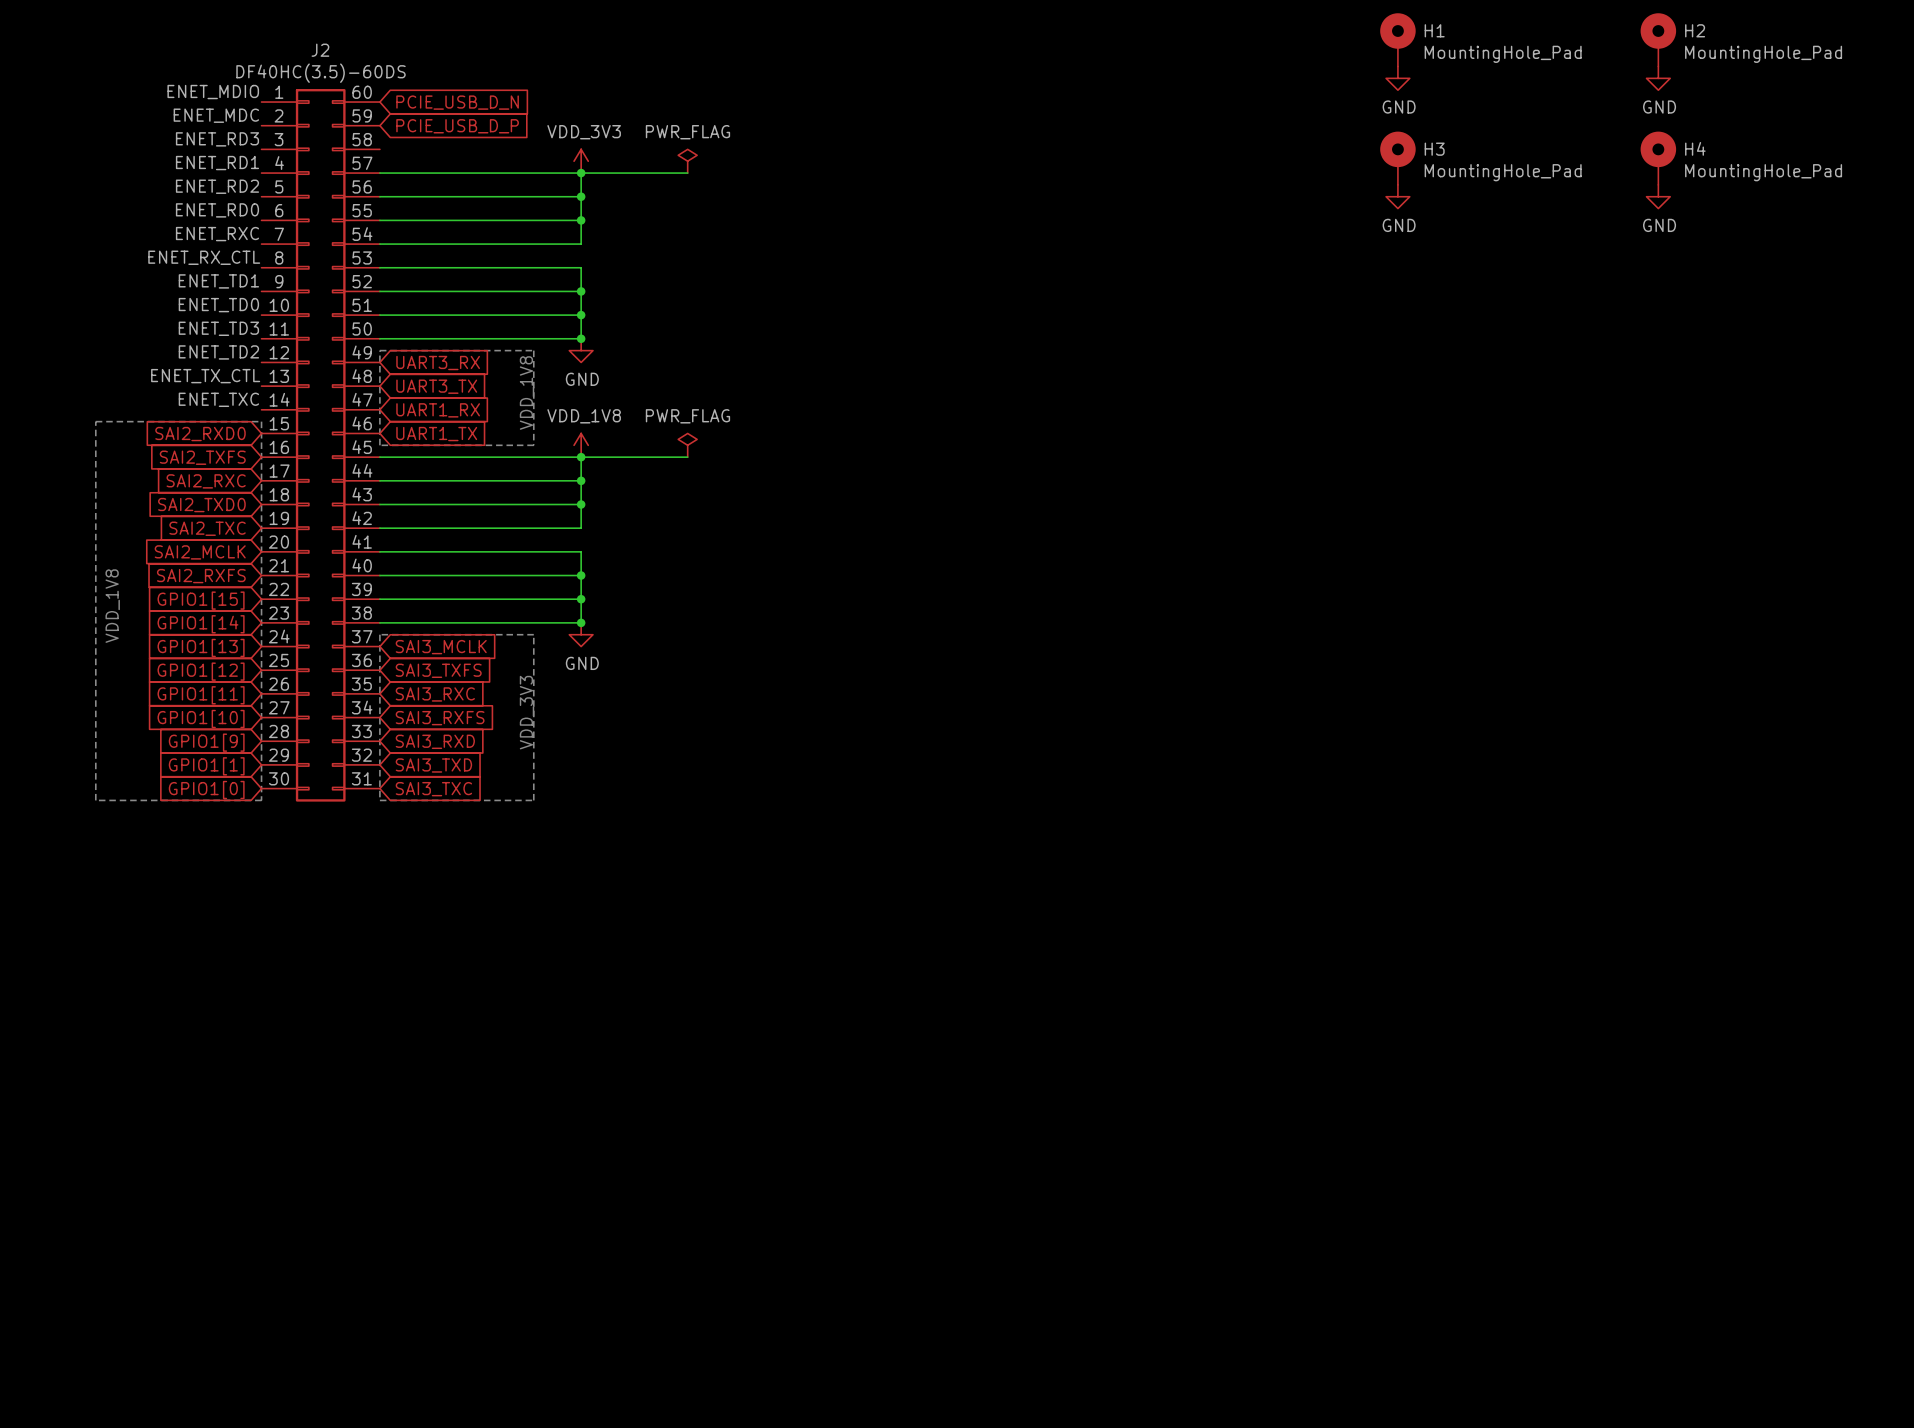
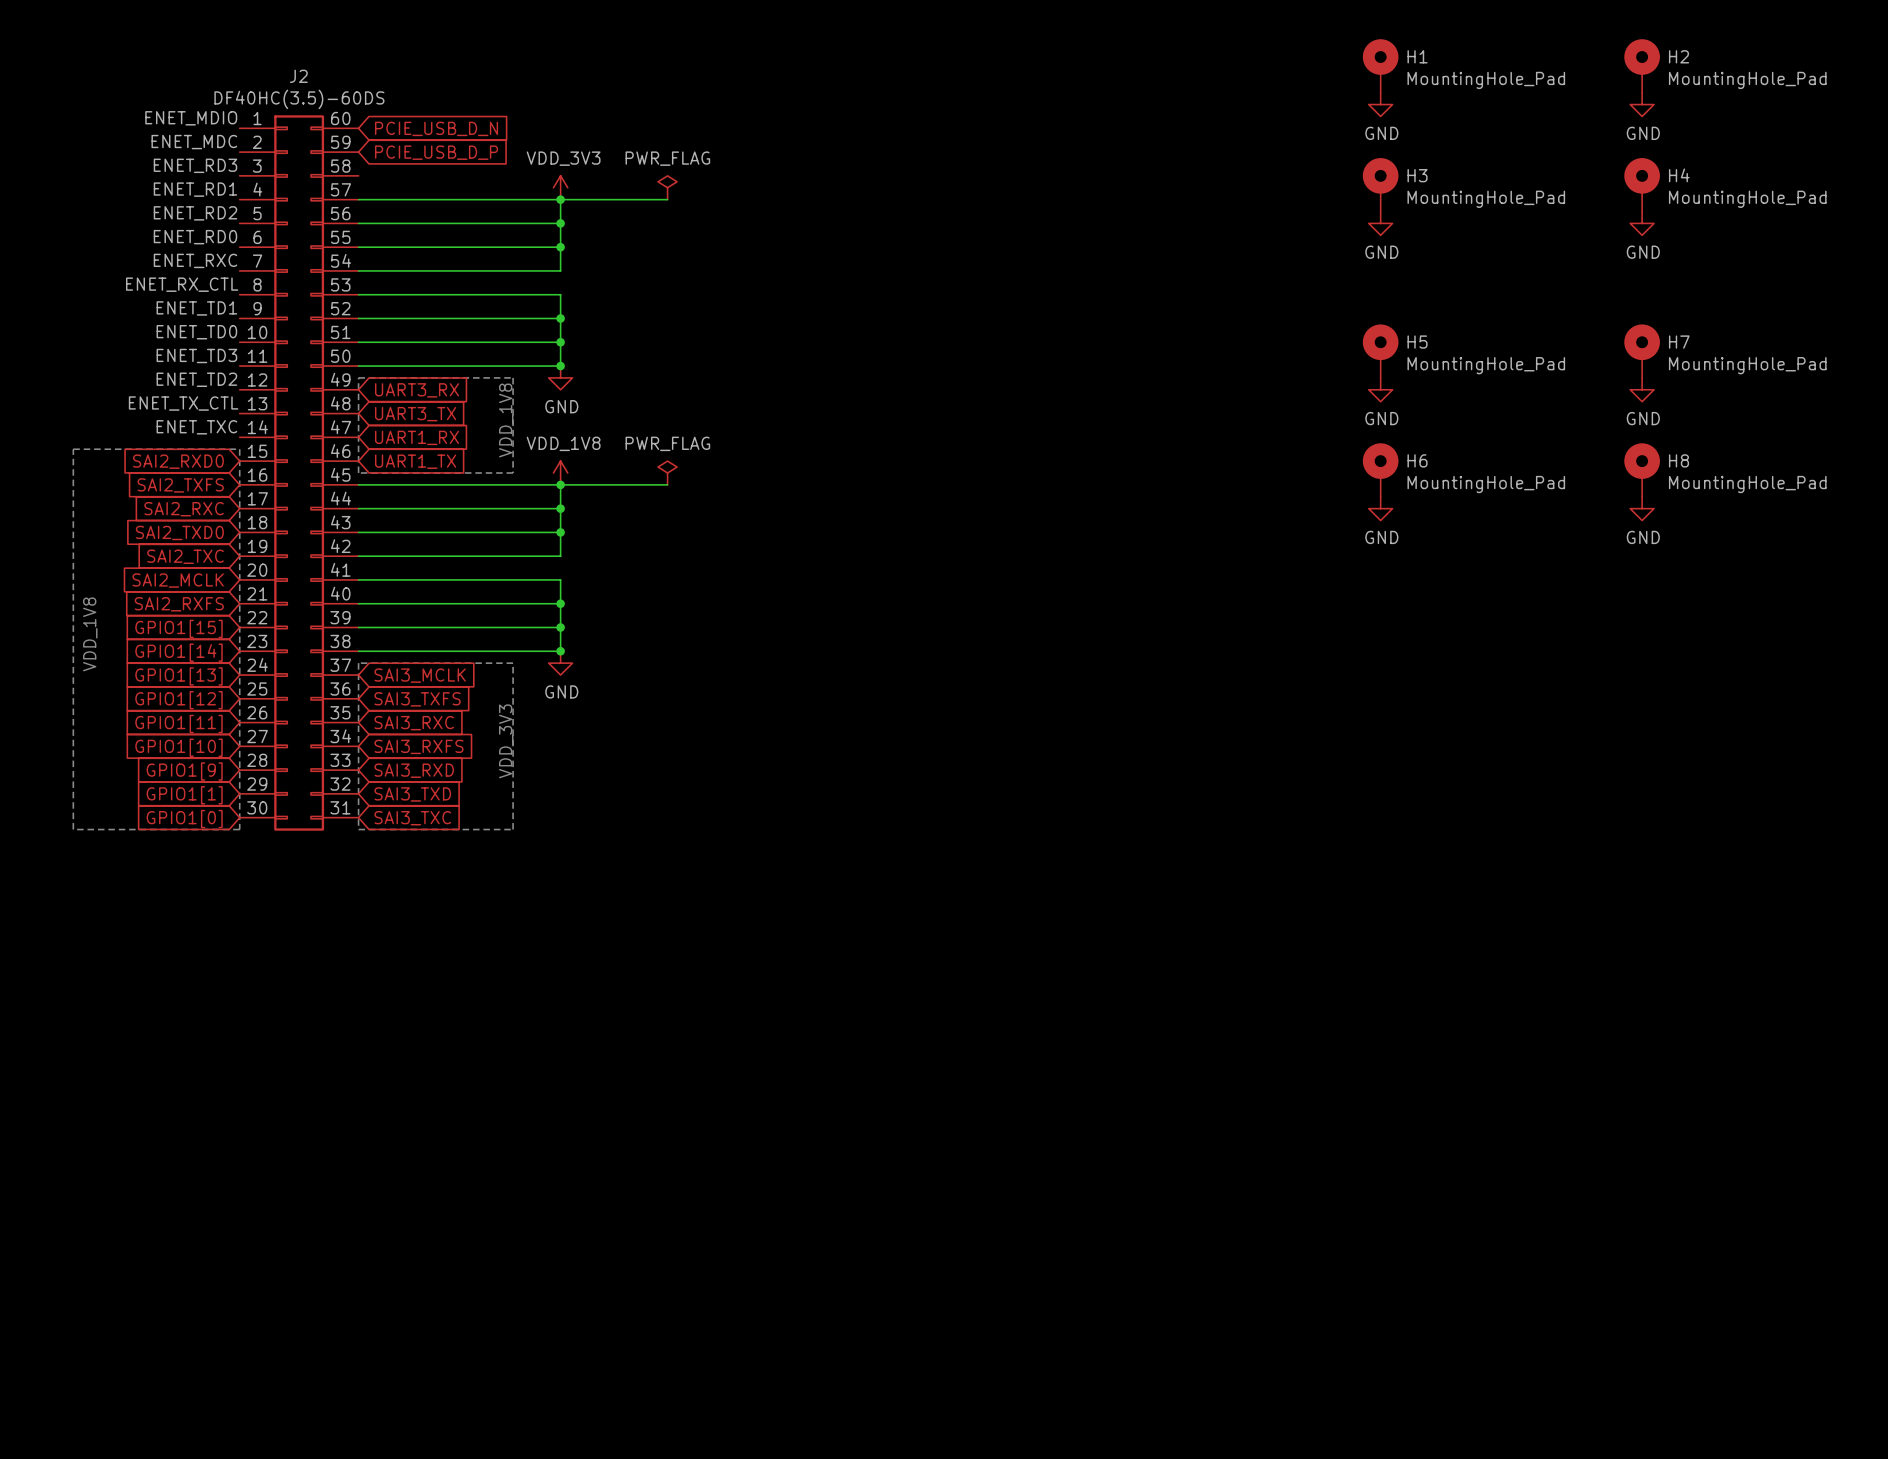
H5: none -> MountingHole_Pad (1380, 351)
H7: none -> MountingHole_Pad (1642, 351)
power symbol: none -> GND (1380, 389)
power symbol: none -> GND (1642, 389)
H6: none -> MountingHole_Pad (1380, 470)
H8: none -> MountingHole_Pad (1642, 470)
power symbol: none -> GND (1380, 508)
power symbol: none -> GND (1642, 508)

